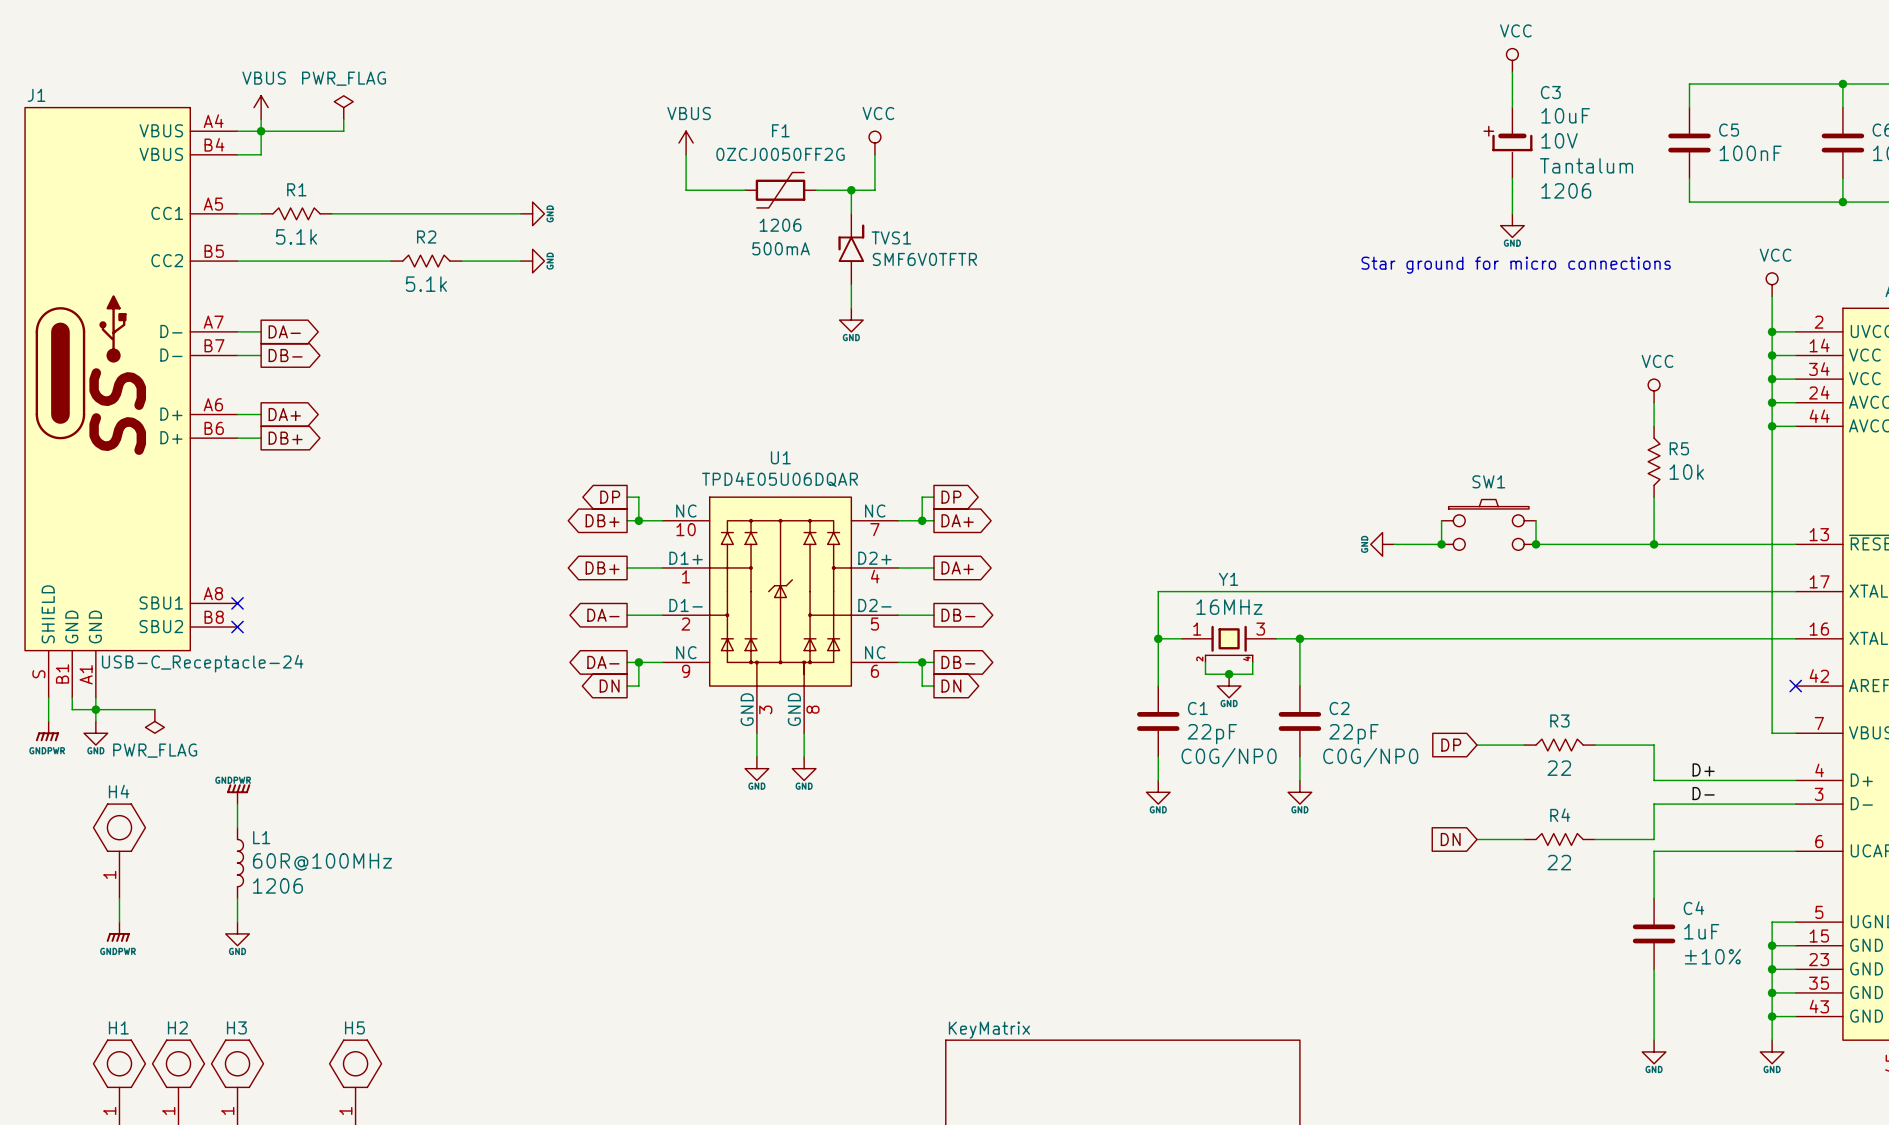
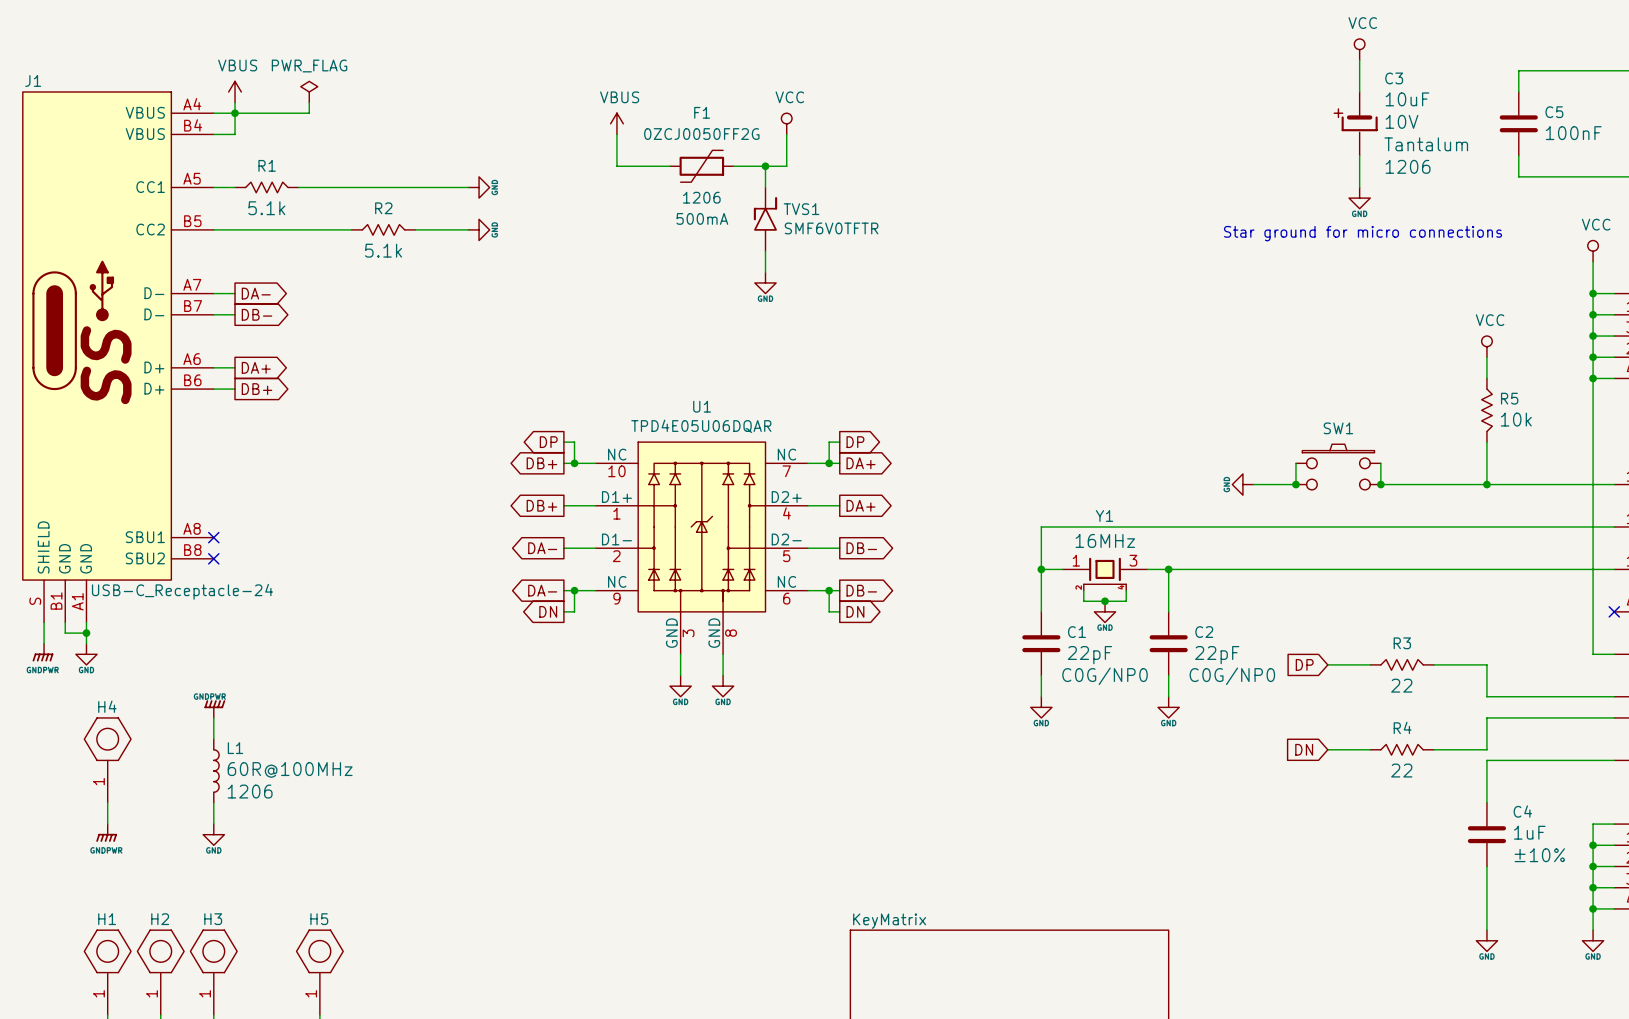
wire: (95, 709) (154, 709) -> none
power symbol: PWR_FLAG (154, 721) -> none
label: D+ (1703, 769) -> none
label: D- (1703, 793) -> none

